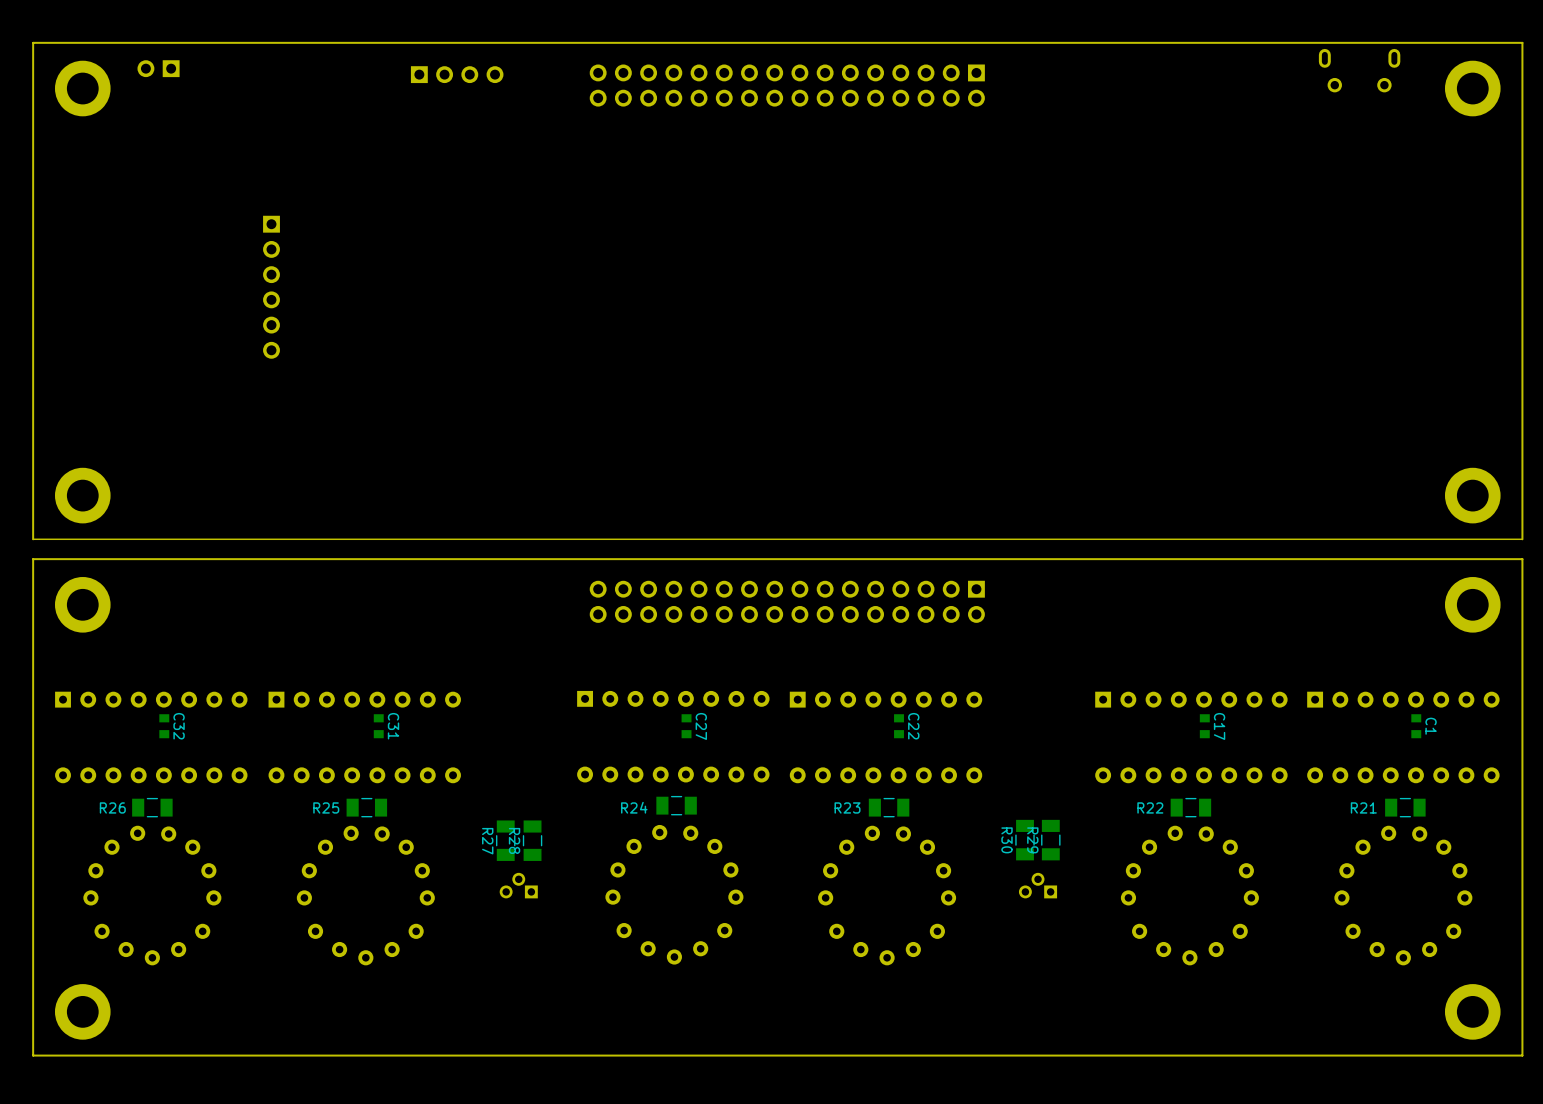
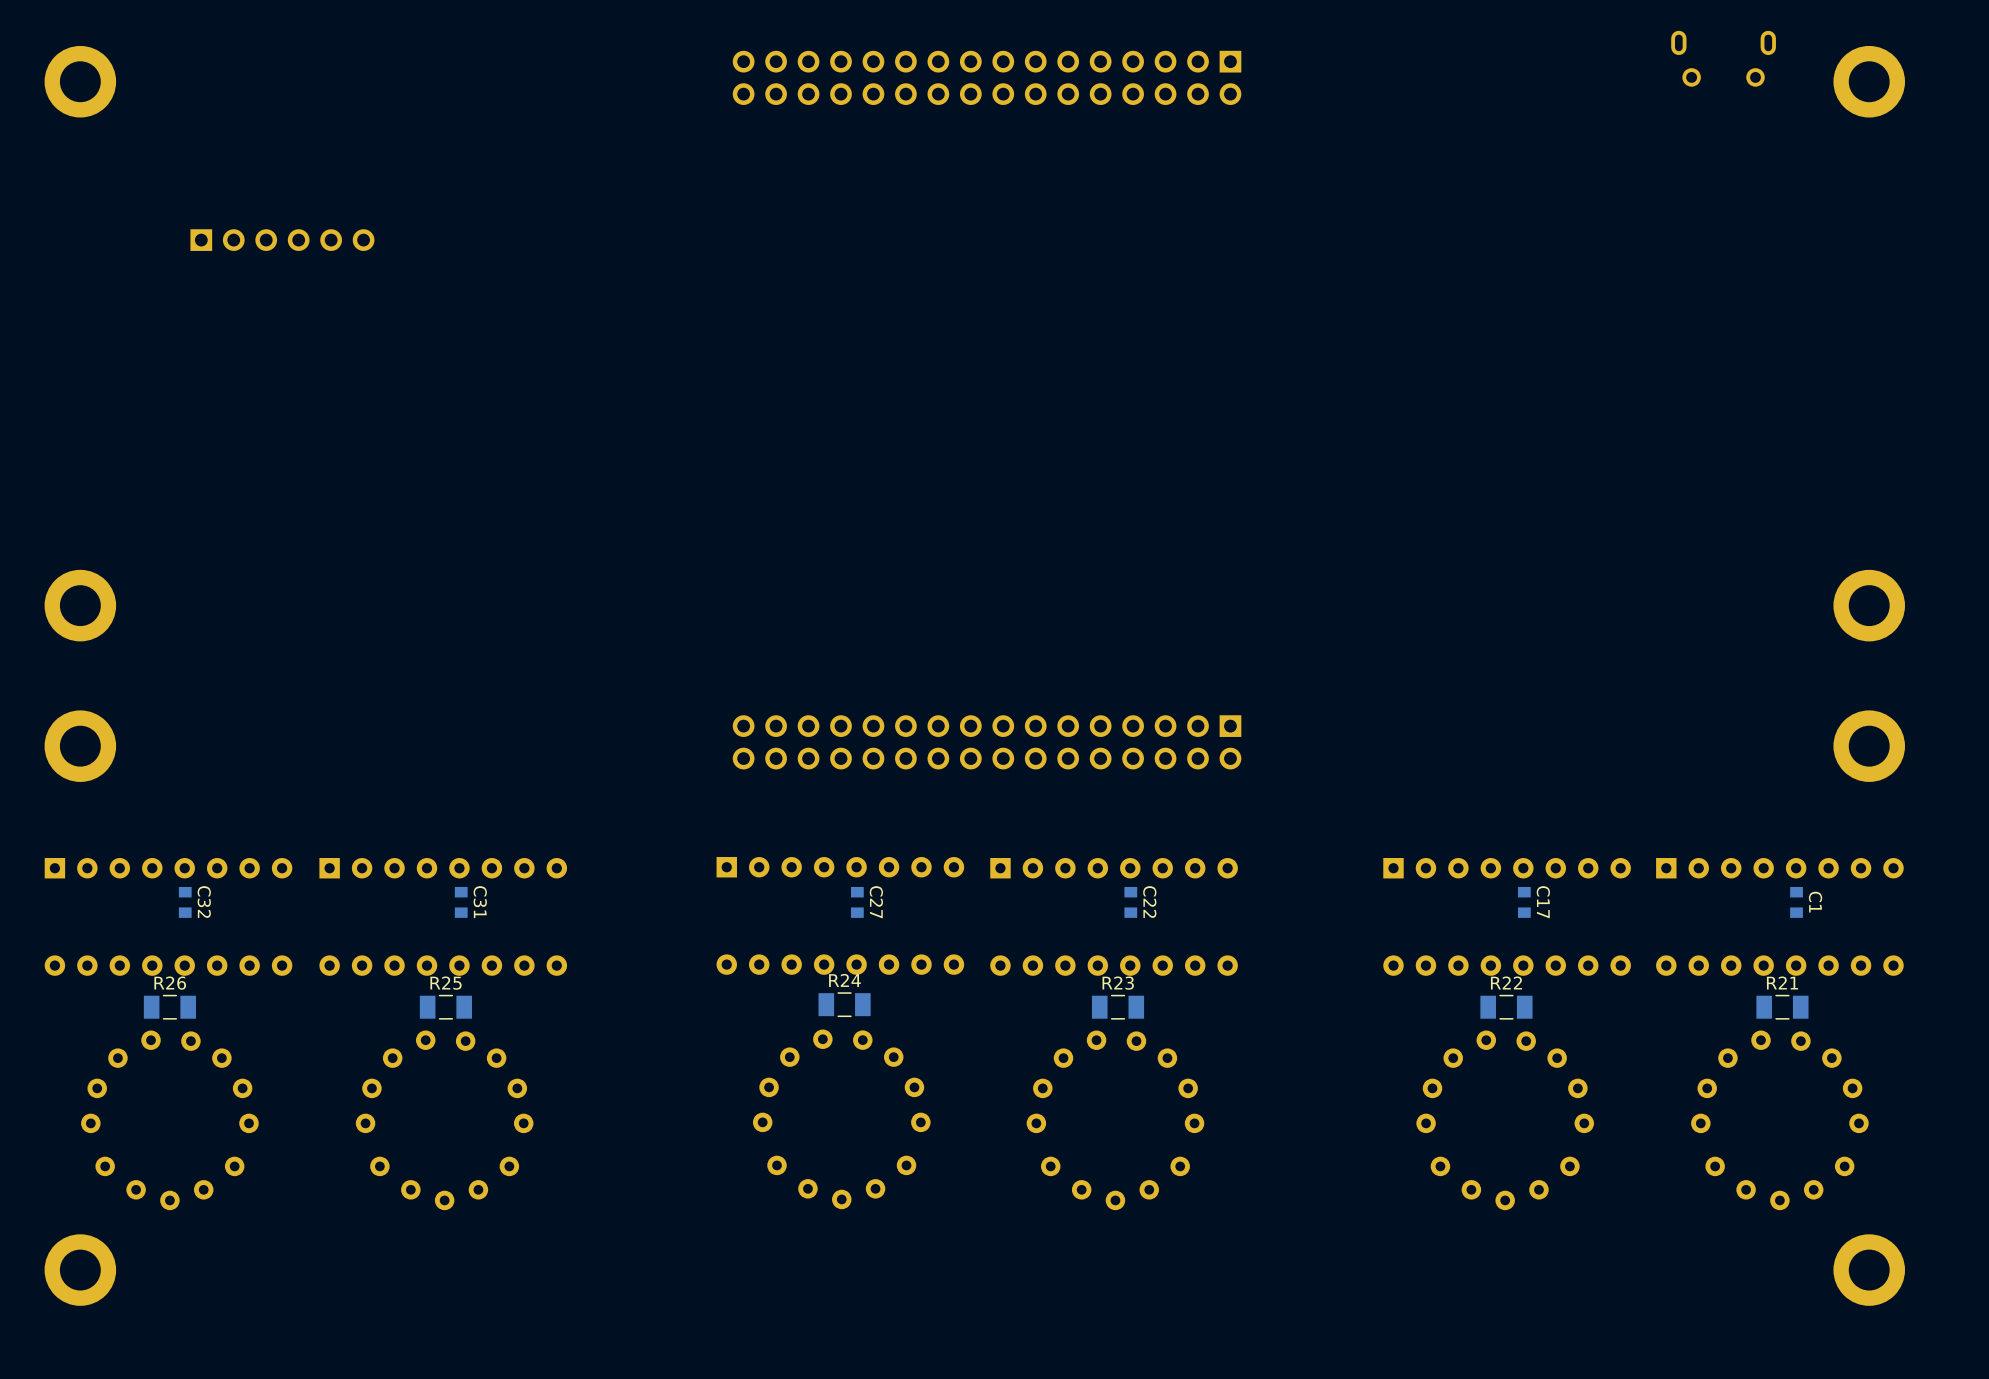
board edge: (1522, 42) (1522, 539) (33, 539) (33, 42) (1522, 42) -> none
part: (158, 68) -> none
part: (457, 74) -> none
part rotation: 0° (271, 287) -> 90° counterclockwise (282, 240)
board edge: (1522, 559) (1522, 1055) (33, 1055) (33, 559) (1522, 559) -> none
R26 name position: R26 (112, 807) -> R26 (170, 983)
R25 name position: R25 (326, 807) -> R25 (446, 983)
R24 name position: R24 (634, 807) -> R24 (844, 980)
R23 name position: R23 (847, 807) -> R23 (1118, 983)
R22 name position: R22 (1150, 807) -> R22 (1506, 982)
R21 name position: R21 (1363, 807) -> R21 (1782, 982)
R27: (505, 840) -> none
R28: (532, 840) -> none
R30: (1025, 840) -> none
R29: (1050, 840) -> none
part: (518, 885) -> none
part: (1038, 885) -> none

